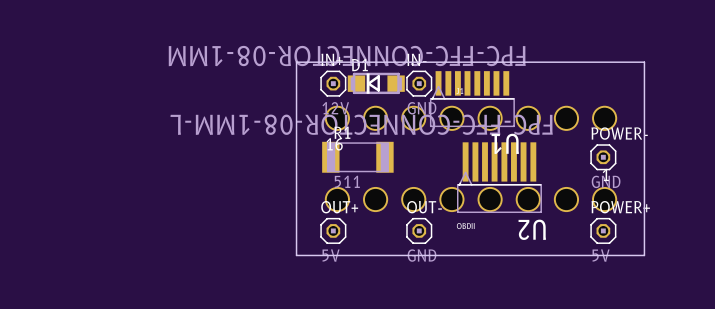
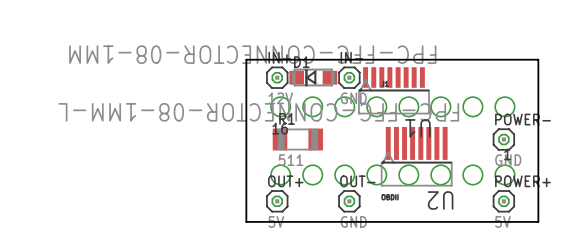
R1 footprint: [322, 141, 394, 173] -> [272, 128, 324, 151]

